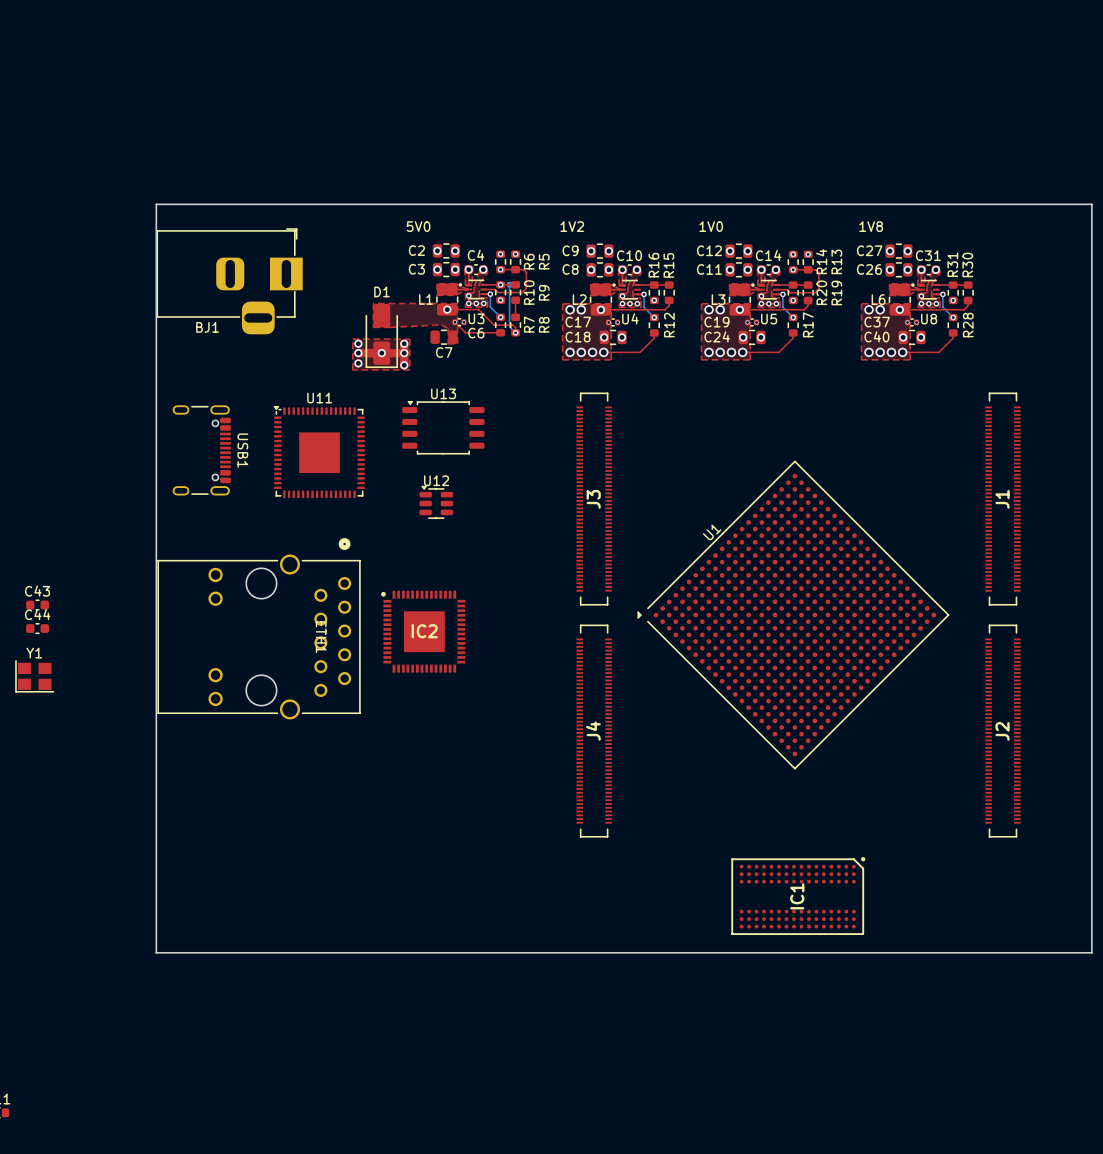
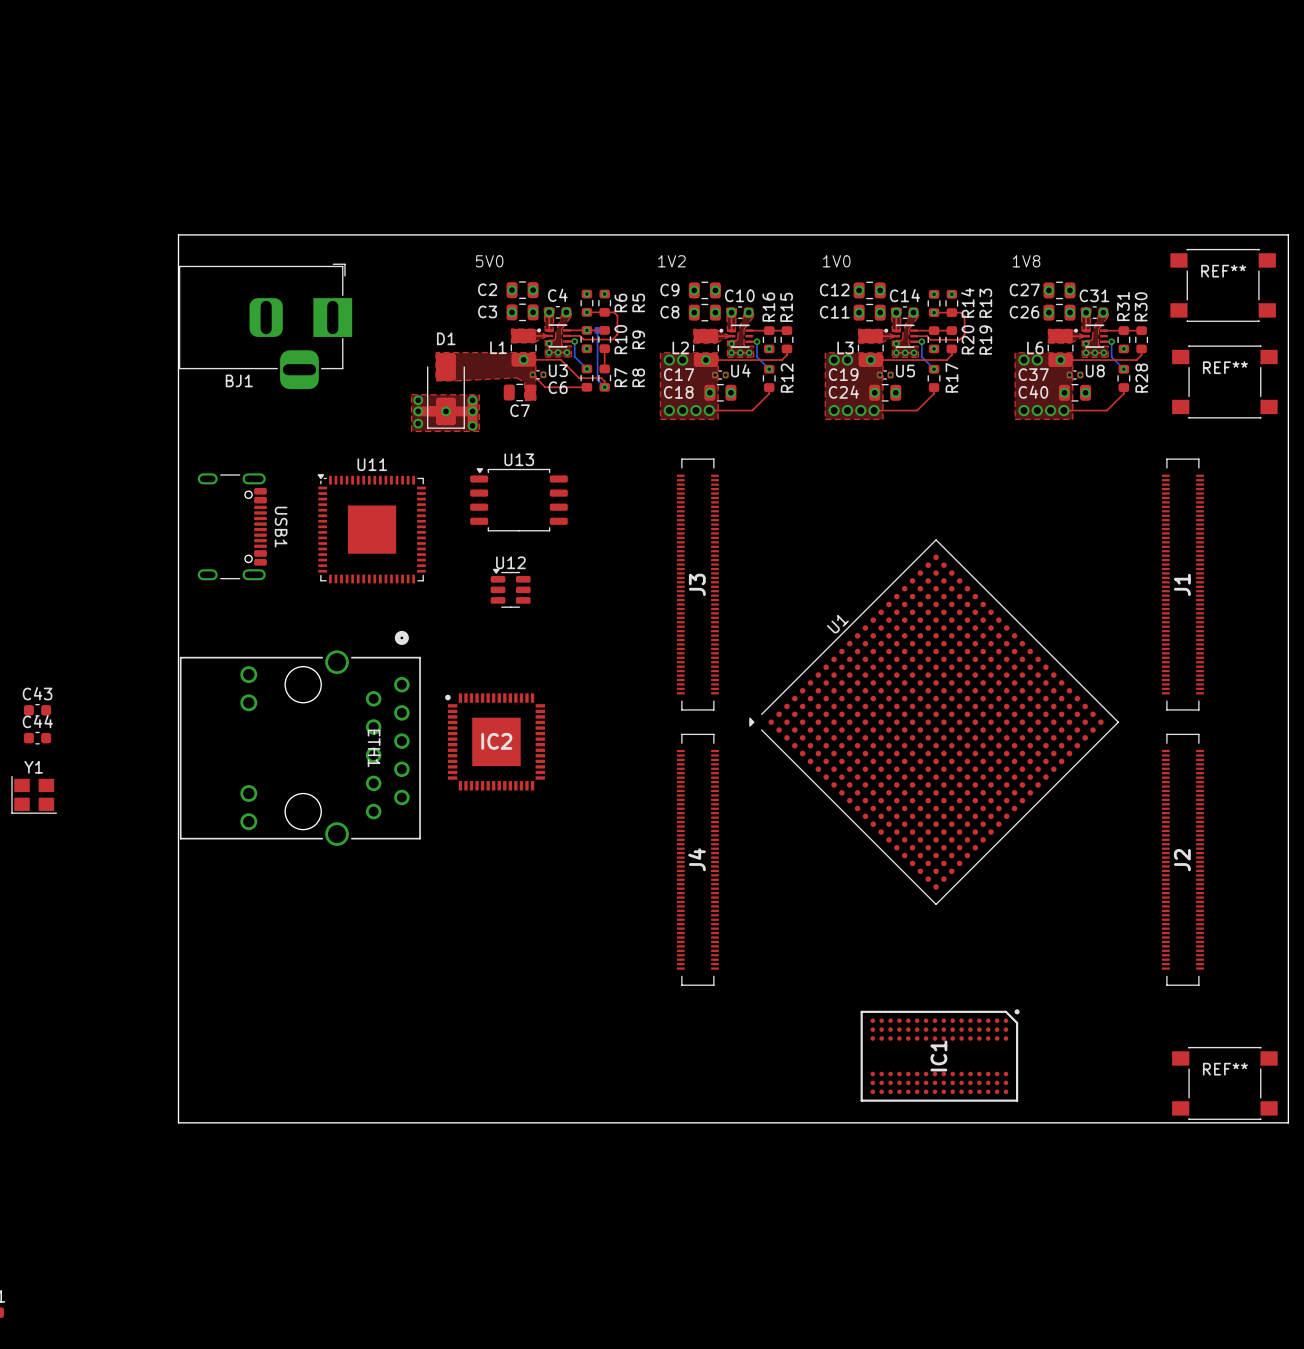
REF**: none -> (1223, 285)
REF**: none -> (1224, 381)
REF**: none -> (1224, 1083)

